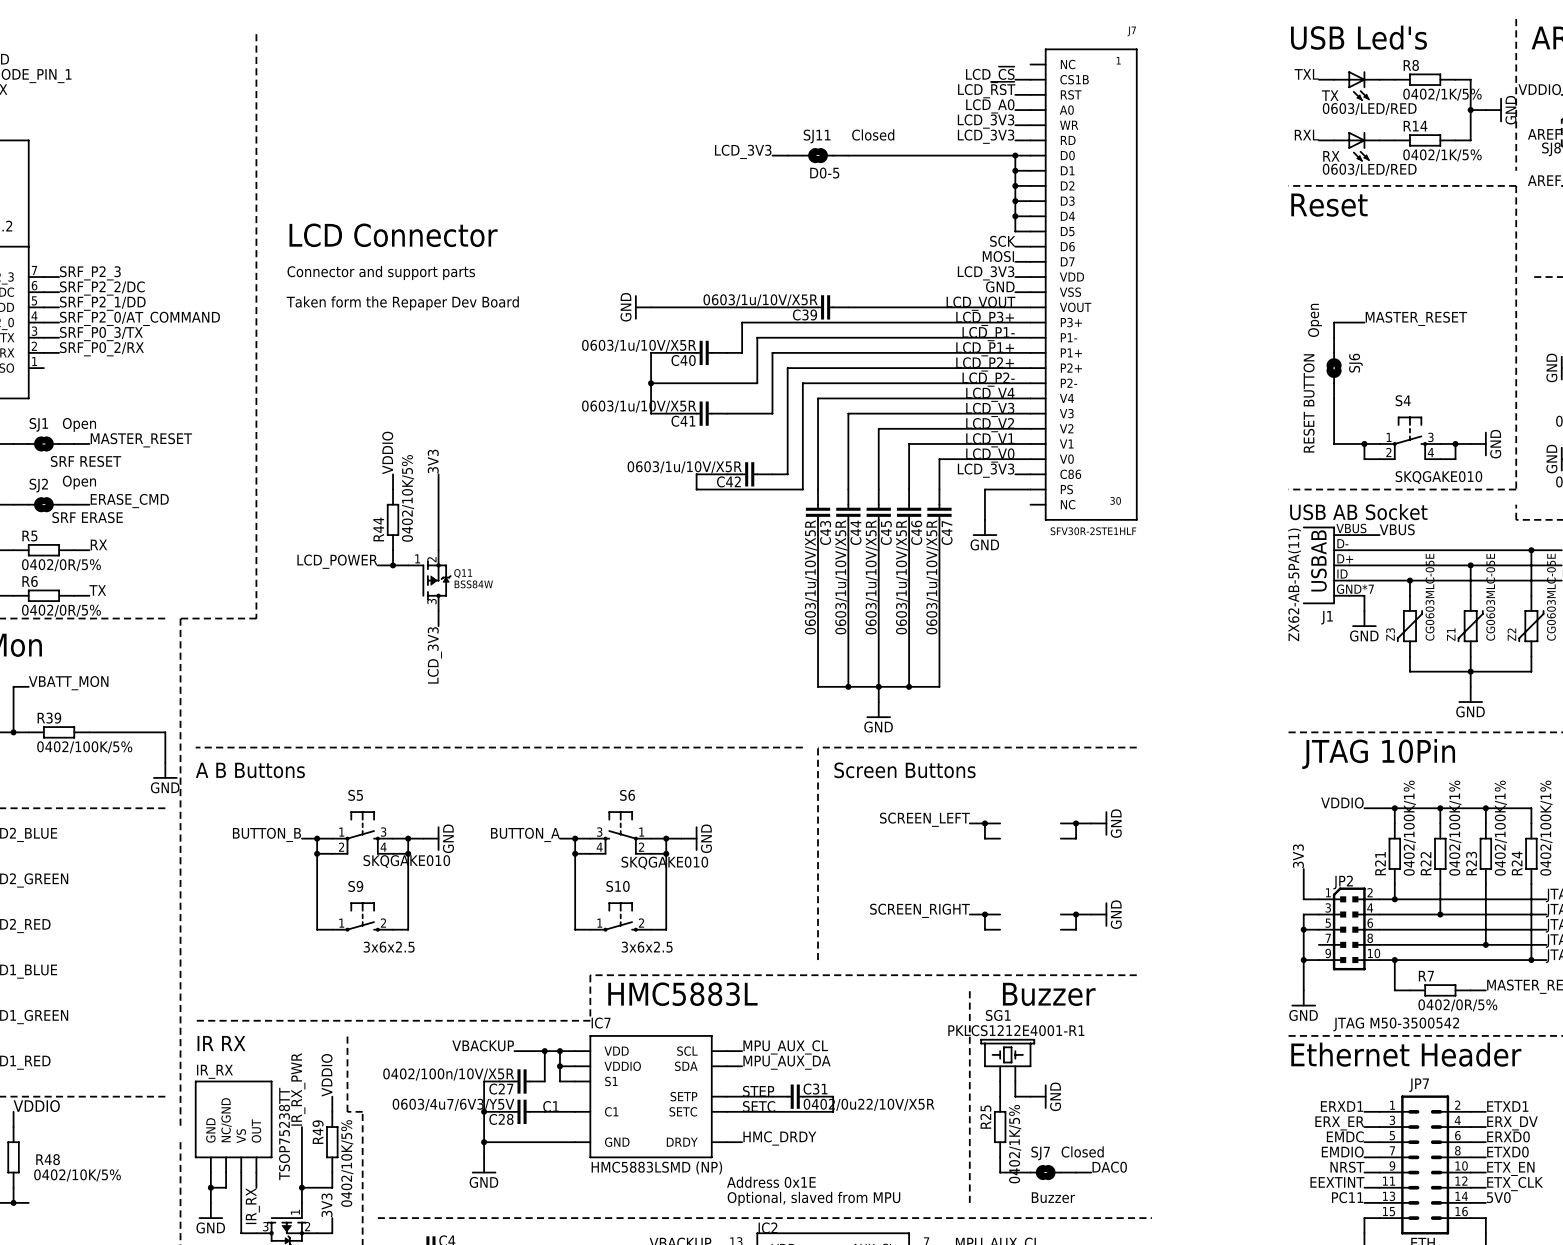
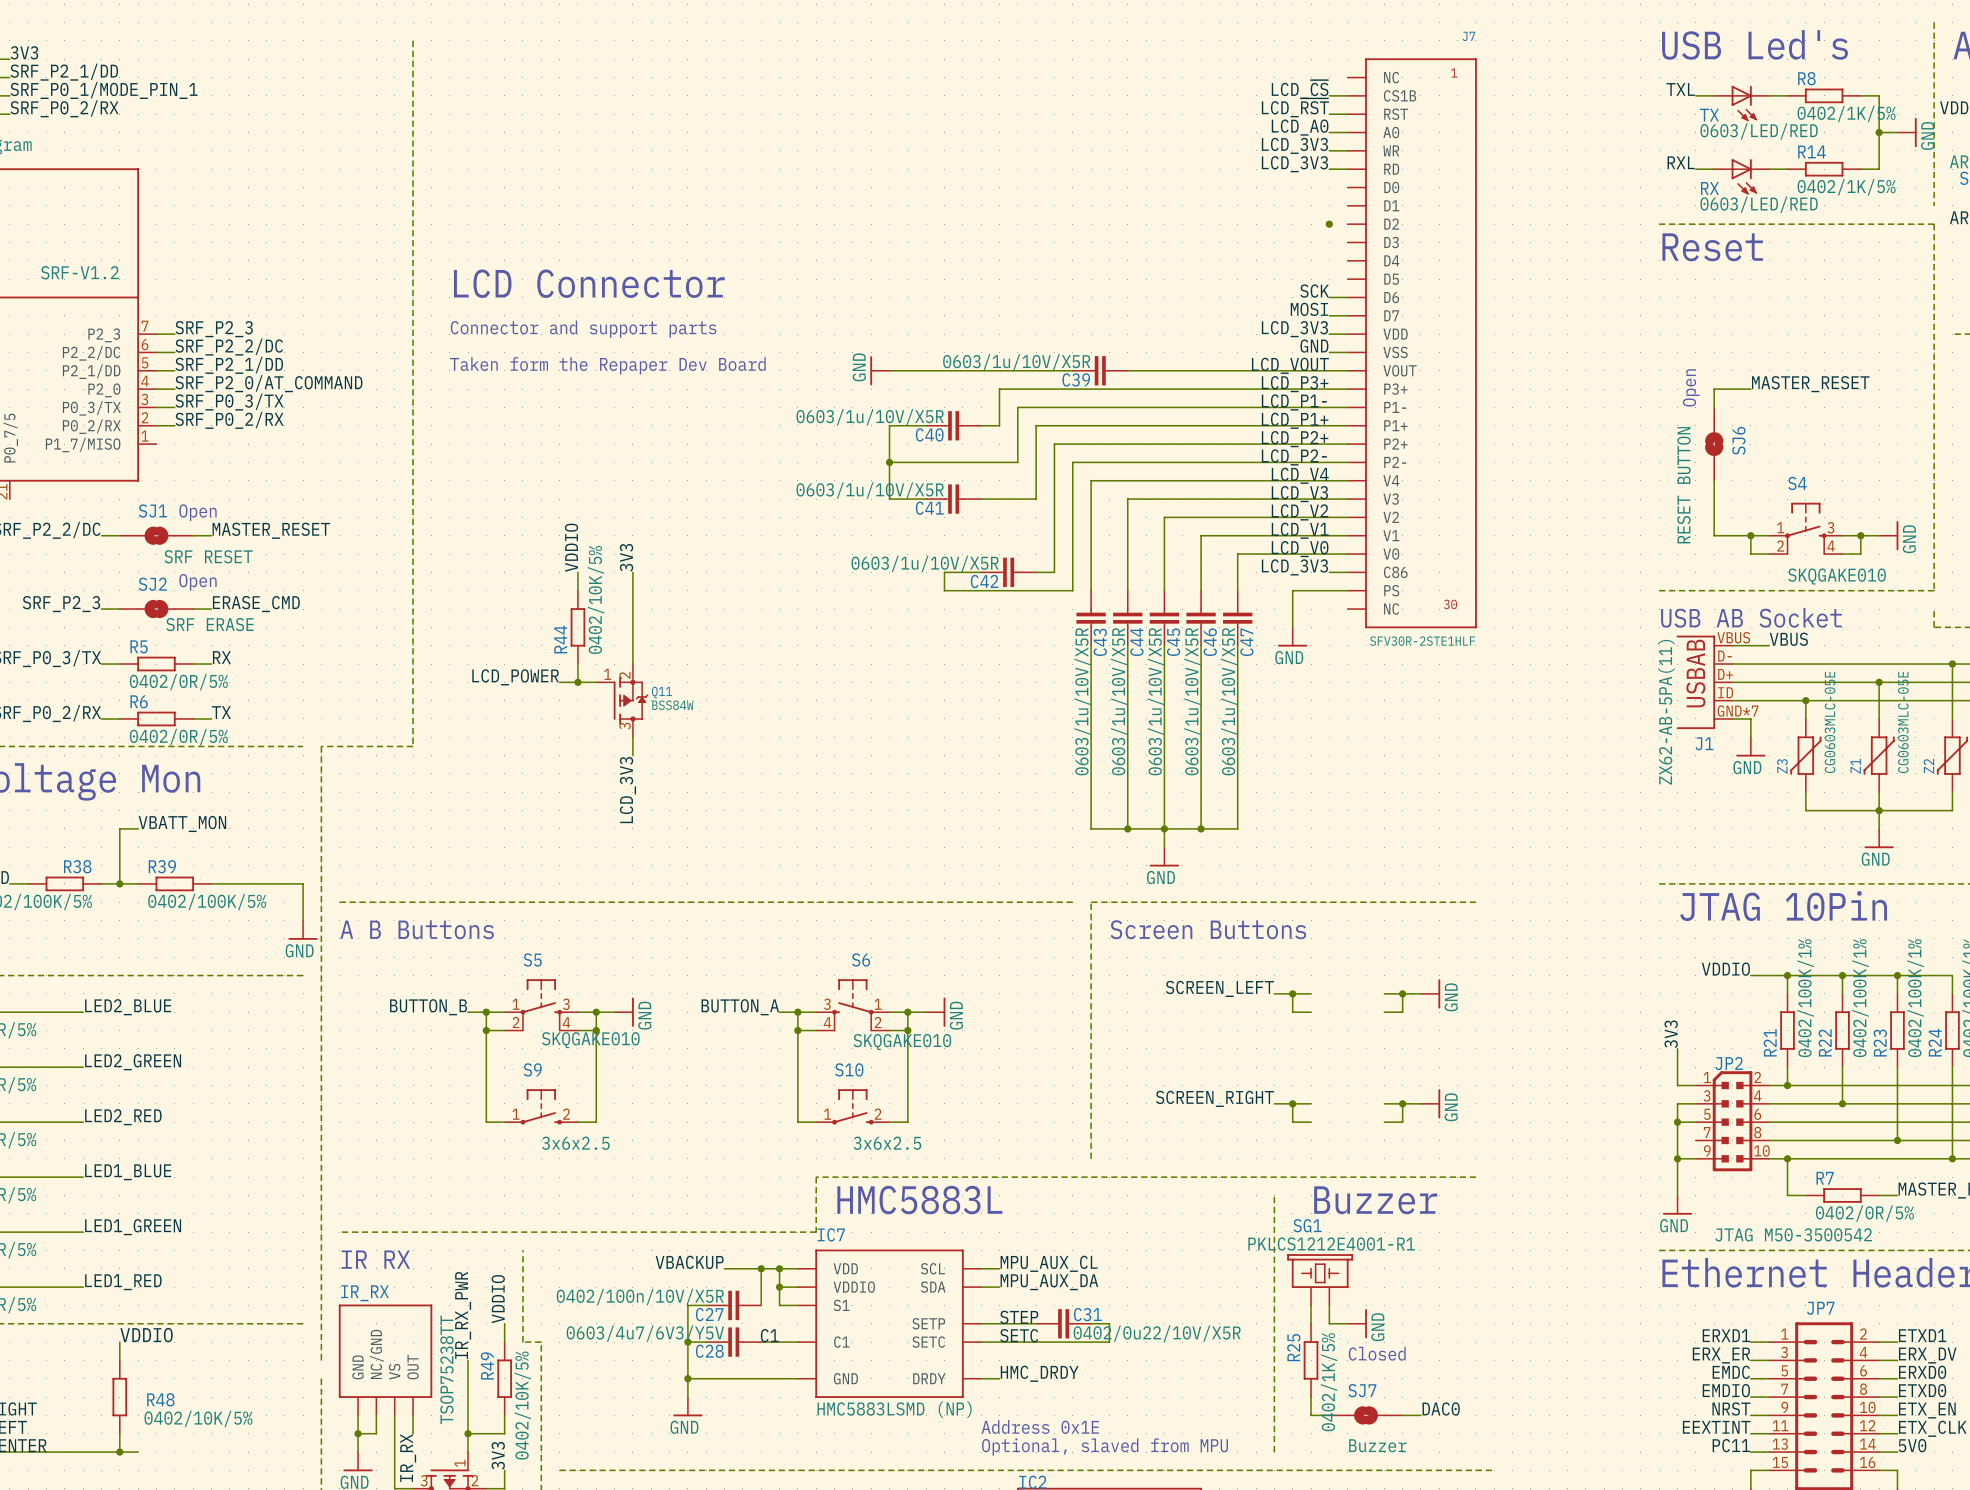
text: Closed (873, 134) -> none
label: LCD_3V3 (743, 151) -> none
wire: (772, 155) (787, 155) -> none
SJ11: D0-5 (818, 155) -> none
wire: (848, 155) (1030, 155) -> none
wire: (1015, 155) (1015, 231) (1030, 231) -> none
junction: (1015, 155) -> none
wire: (1015, 170) (1030, 170) -> none
junction: (1015, 170) -> none
wire: (1015, 185) (1030, 185) -> none
wire: (1015, 201) (1030, 201) -> none
junction: (1015, 201) -> none
wire: (1015, 216) (1030, 216) -> none
junction: (1015, 216) -> none
text position: Closed (1082, 1151) -> Closed (1377, 1353)

